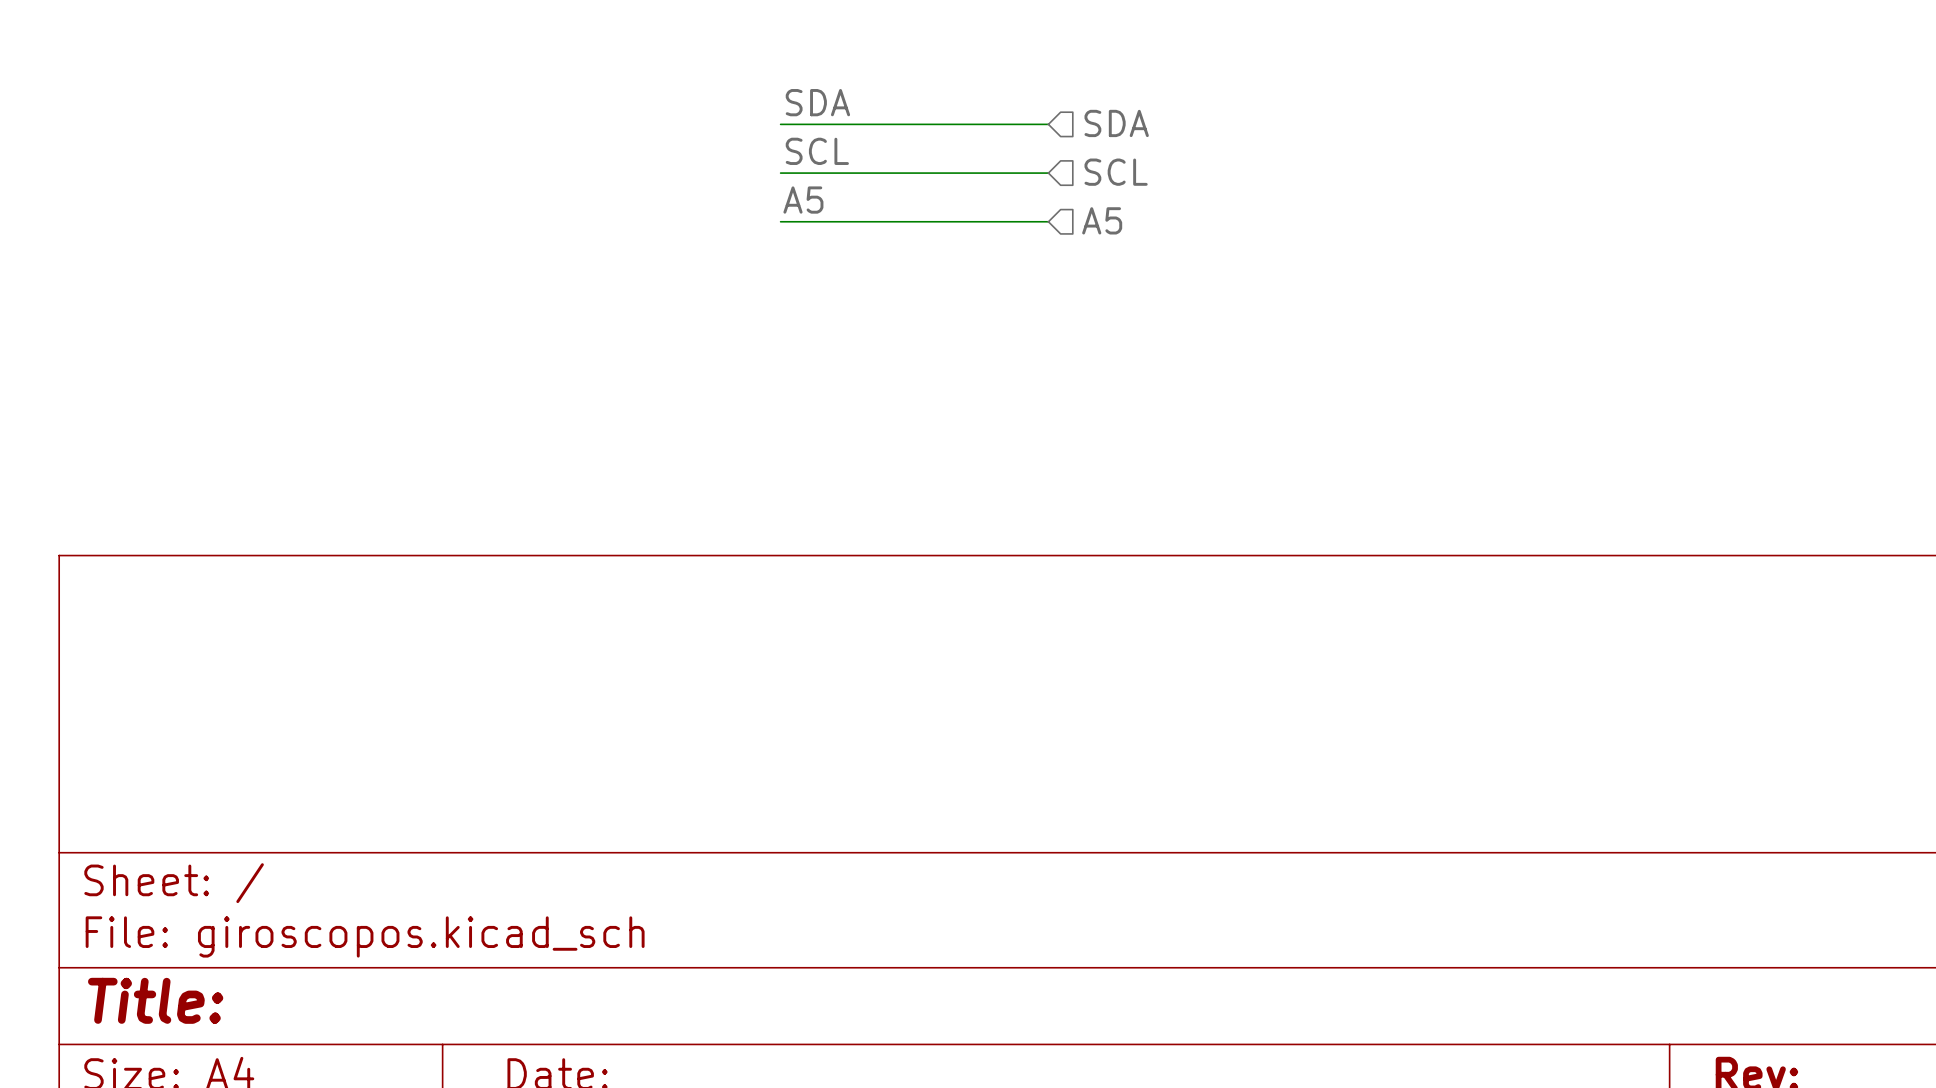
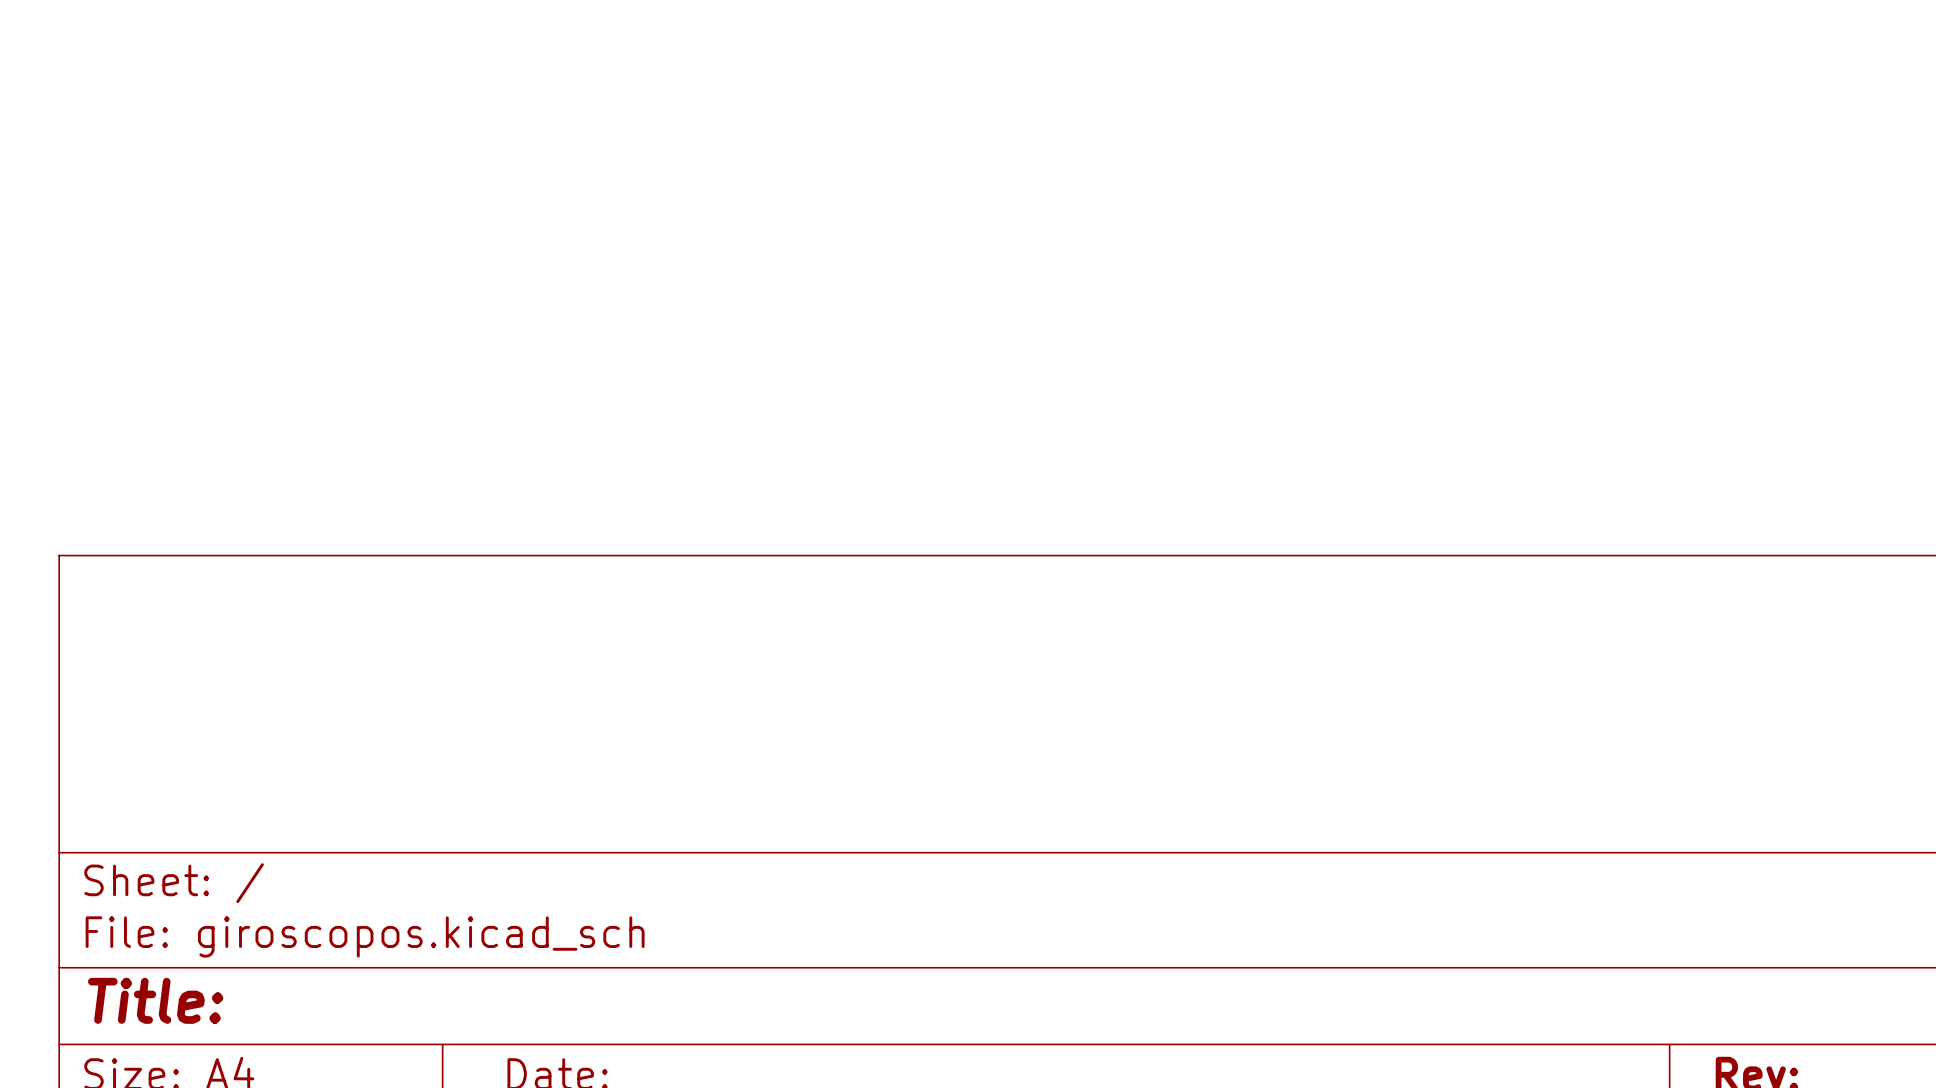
label: SDA (817, 102) -> none
hierarchical label: SDA (1116, 123) -> none
wire: (780, 124) (1048, 124) -> none
label: SCL (817, 151) -> none
hierarchical label: SCL (1116, 172) -> none
wire: (780, 173) (1048, 173) -> none
label: A5 (803, 200) -> none
hierarchical label: A5 (1102, 220) -> none
wire: (780, 221) (1048, 221) -> none

